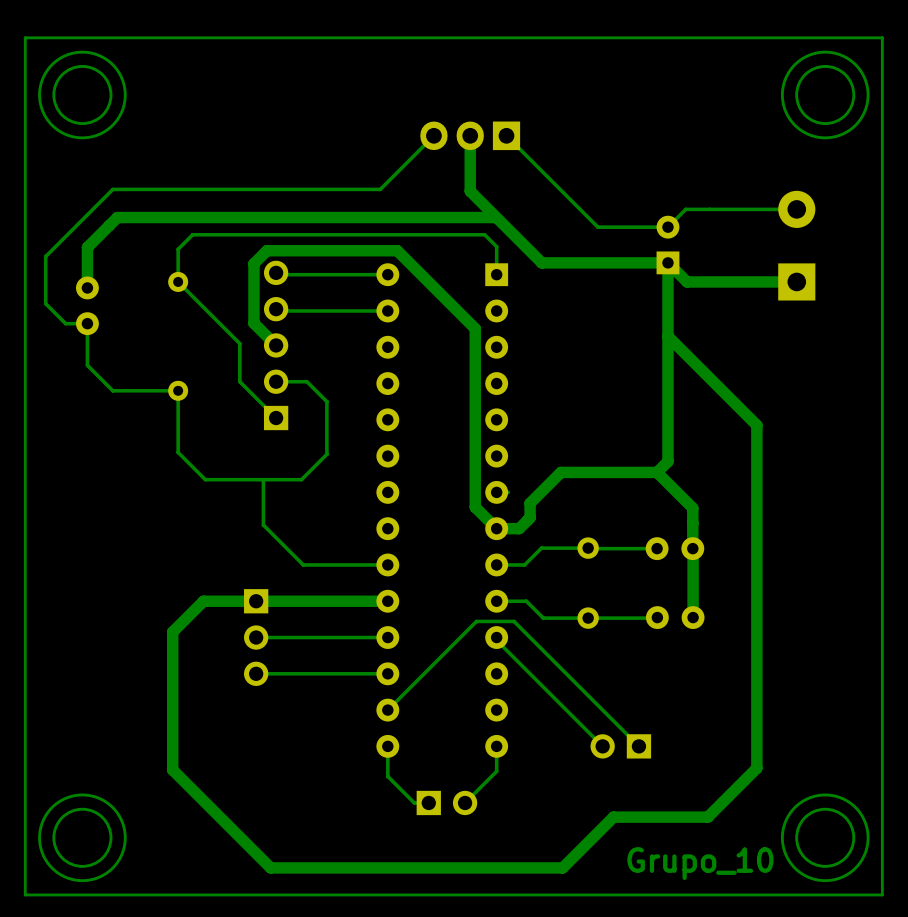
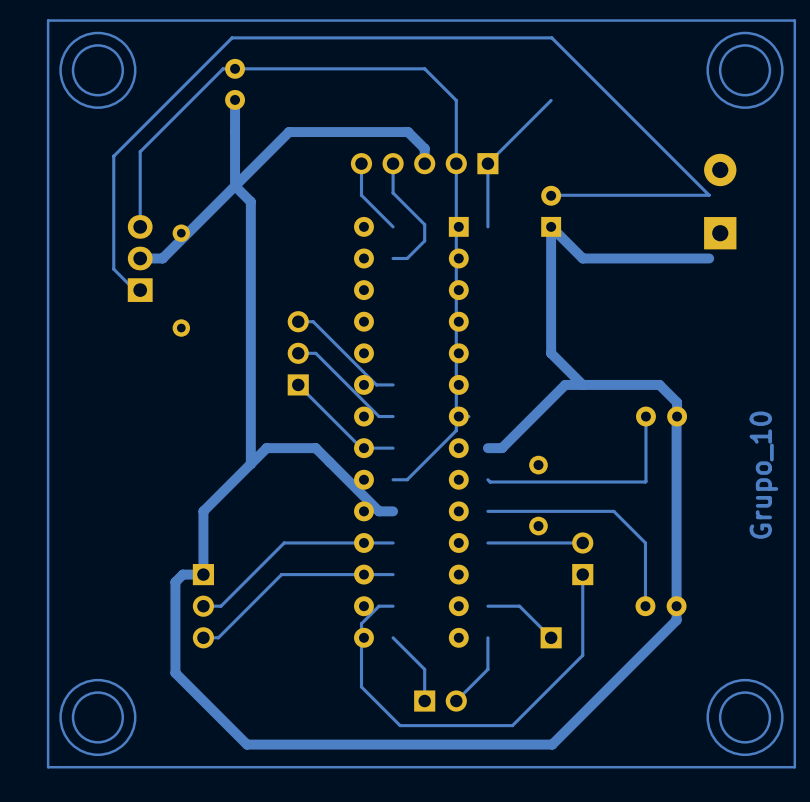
bottom track: none -> (235, 99) (235, 186) (250, 201) (250, 463)
bottom track: none -> (551, 100) (487, 163) (487, 226)
bottom track: (433, 135) (380, 189) (112, 189) (45, 256) (45, 303) (65, 323) (87, 323) (87, 365) (112, 390) (178, 390) (178, 452) (205, 479) (301, 479) (326, 454) (326, 401) (306, 381) (276, 381) -> none
bottom track: (470, 135) (470, 191) -> none
part: (470, 135) -> none
bottom track: (506, 135) (597, 227) (667, 227) (685, 209) (796, 209) -> none
bottom track: (470, 191) (541, 262) (667, 262) -> none
bottom track: none -> (393, 163) (393, 193) (424, 224) (424, 240) (407, 258) (393, 258)
bottom track: none -> (424, 163) (424, 148) (408, 132) (289, 132) (162, 258) (140, 258)
bottom track: (494, 217) (117, 217) (87, 247) (87, 287) -> none
bottom track: none -> (551, 195) (709, 195) (551, 37) (232, 37) (113, 156) (113, 269) (134, 290) (140, 290)
part position: (667, 245) -> (551, 211)
bottom track: (397, 250) (266, 250) (253, 263) (253, 323) (276, 345) -> (372, 206) (361, 195) (361, 163)
bottom track width: thick (397, 250) (421, 274) -> thin (372, 206) (393, 226)
bottom track: (667, 262) (667, 461) (657, 472) -> none
bottom track: (667, 262) (687, 281) (796, 281) -> none
bottom track: (276, 272) (277, 274) (387, 274) -> none
bottom track: none -> (140, 226) (140, 151) (223, 68) (424, 68) (456, 100) (456, 430) (407, 479) (393, 479)
bottom track: (421, 274) (475, 328) (475, 507) (496, 528) (519, 528) (530, 517) (530, 503) (560, 472) (657, 472) -> none
bottom track: (496, 274) (496, 246) (484, 234) (192, 234) (178, 249) (178, 281) (239, 343) (239, 381) (276, 418) -> none
part position: (87, 305) -> (235, 84)
bottom track: (276, 309) (277, 310) (387, 310) -> none
part: none -> (140, 258)
bottom track: none -> (709, 258) (582, 258) (551, 226) (551, 353) (582, 384)
bottom track: (667, 336) (756, 425) (756, 768) (707, 817) (613, 817) (562, 867) (270, 867) (172, 769) (172, 632) (203, 601) (387, 601) -> none
part rotation: 0° (276, 345) -> 90° counterclockwise (424, 163)
part position: (276, 345) -> (424, 163)
bottom track: none -> (298, 321) (313, 321) (376, 384) (393, 384)
bottom track: none -> (298, 353) (315, 353) (379, 416) (393, 416)
part: none -> (298, 353)
bottom track: none -> (298, 384) (361, 448) (393, 448)
bottom track: (657, 472) (692, 508) (693, 617) -> none
bottom track: (263, 479) (263, 525) (303, 564) (387, 564) -> none
bottom track: none -> (645, 416) (645, 482) (490, 482) (487, 479)
part: none -> (661, 416)
bottom track: none -> (487, 448) (502, 448) (565, 384) (659, 384) (677, 402) (676, 620) (552, 744) (246, 744) (175, 673) (175, 582) (182, 574) (203, 574) (203, 511) (266, 448) (315, 448) (379, 511) (393, 511)
bottom track: (657, 548) (541, 548) (524, 564) (496, 564) -> none
part: (674, 548) -> none
bottom track: (496, 601) (526, 601) (543, 618) (657, 617) -> none
bottom track: none -> (487, 511) (613, 511) (645, 542) (645, 606)
part: (675, 617) -> none
part position: (256, 637) -> (203, 606)
bottom track: (296, 637) (256, 637) -> (284, 542) (220, 606) (203, 606)
bottom track: none -> (393, 542) (363, 542)
bottom track: (496, 637) (496, 640) (566, 710) -> (487, 606) (519, 606)
bottom track: none -> (582, 542) (487, 542)
part: none -> (582, 558)
bottom track: (293, 673) (256, 673) -> (281, 574) (218, 637) (203, 637)
bottom track: none -> (393, 574) (363, 574)
bottom track: none -> (582, 574) (582, 655) (512, 725) (400, 725) (361, 686) (361, 623) (379, 606) (393, 606)
bottom track: (387, 710) (476, 621) (514, 621) (638, 746) -> none
part: none -> (661, 606)
bottom track: (387, 746) (387, 776) (414, 802) (428, 802) -> none
bottom track: none -> (393, 637) (424, 669) (424, 701)
bottom track: (496, 746) (496, 771) (465, 802) -> none
bottom track: none -> (487, 637) (487, 669) (456, 701)
part: none -> (551, 637)
part: (620, 746) -> none
part position: (446, 802) -> (440, 701)
text rotation: 0° (700, 863) -> 90° counterclockwise (763, 475)
text position: Grupo_10 (700, 863) -> Grupo_10 (763, 475)

